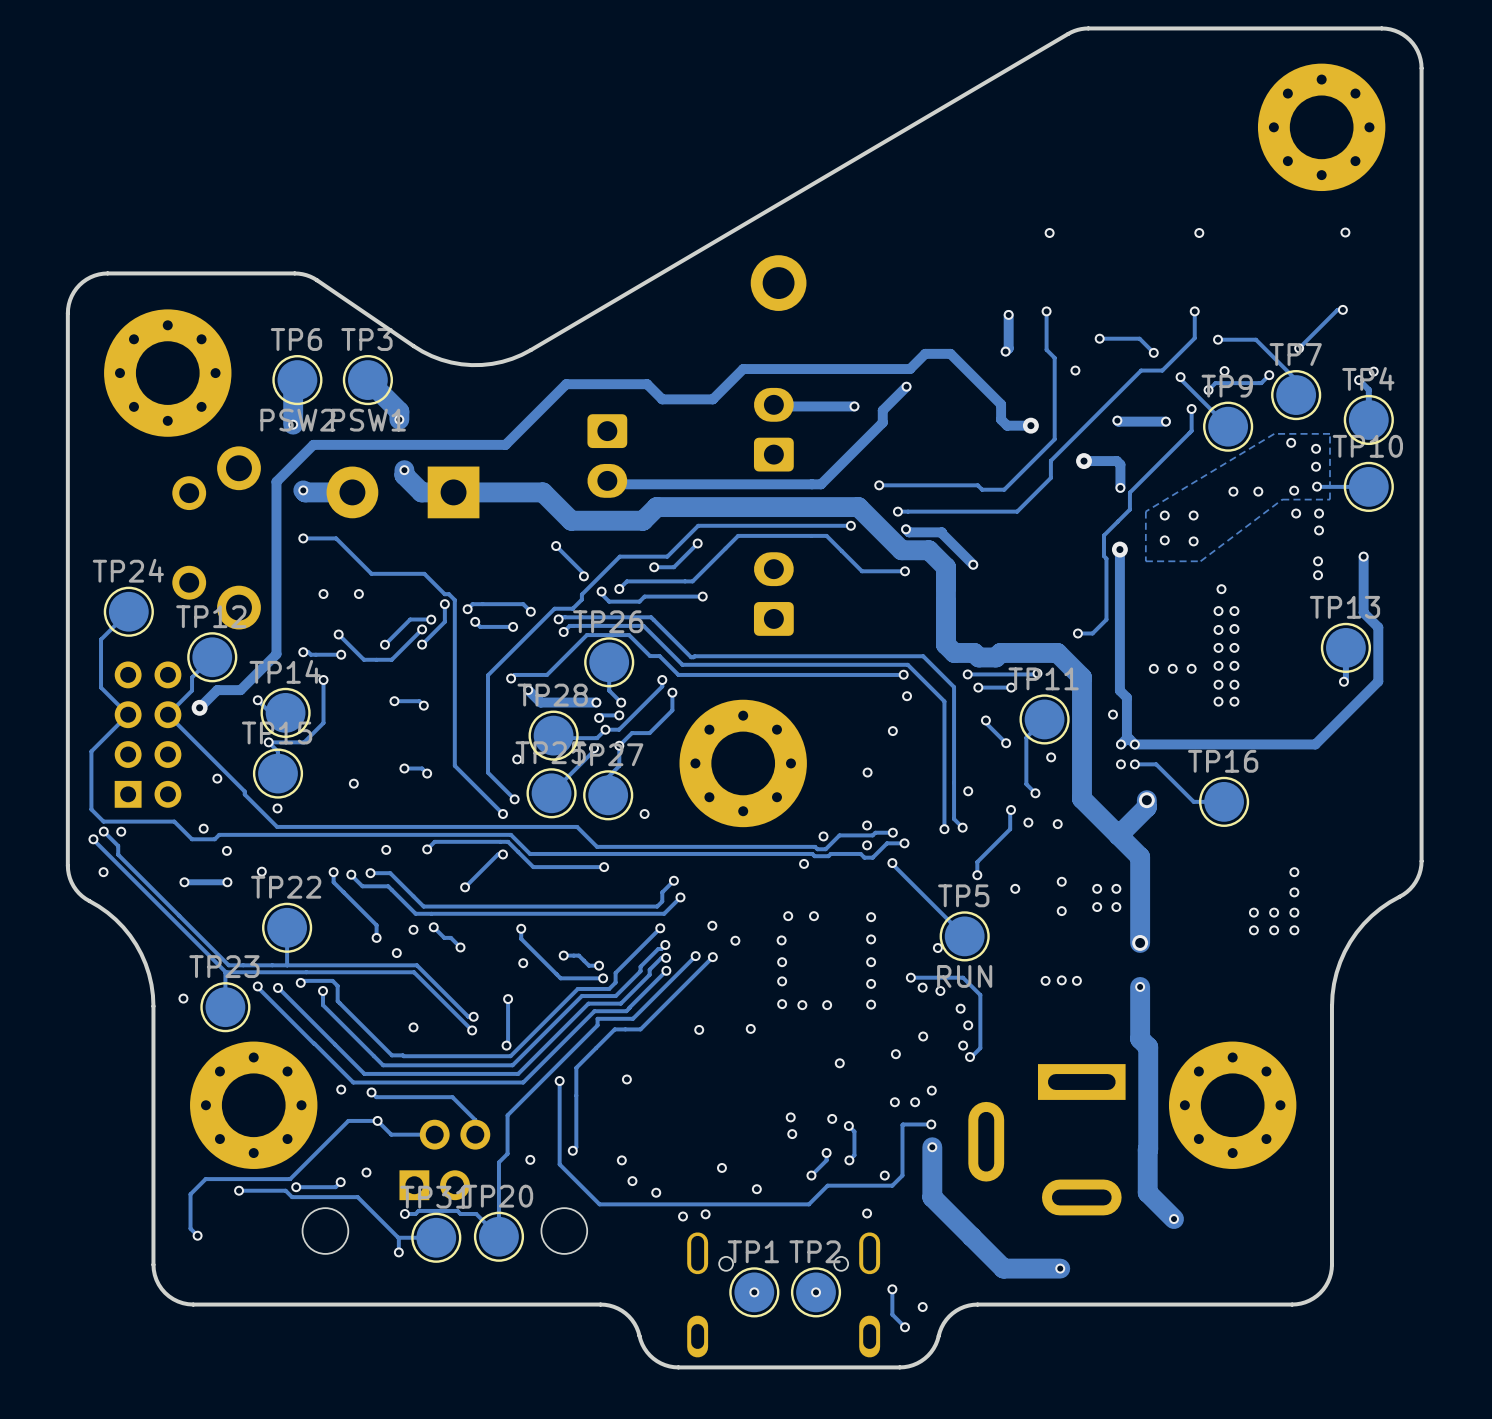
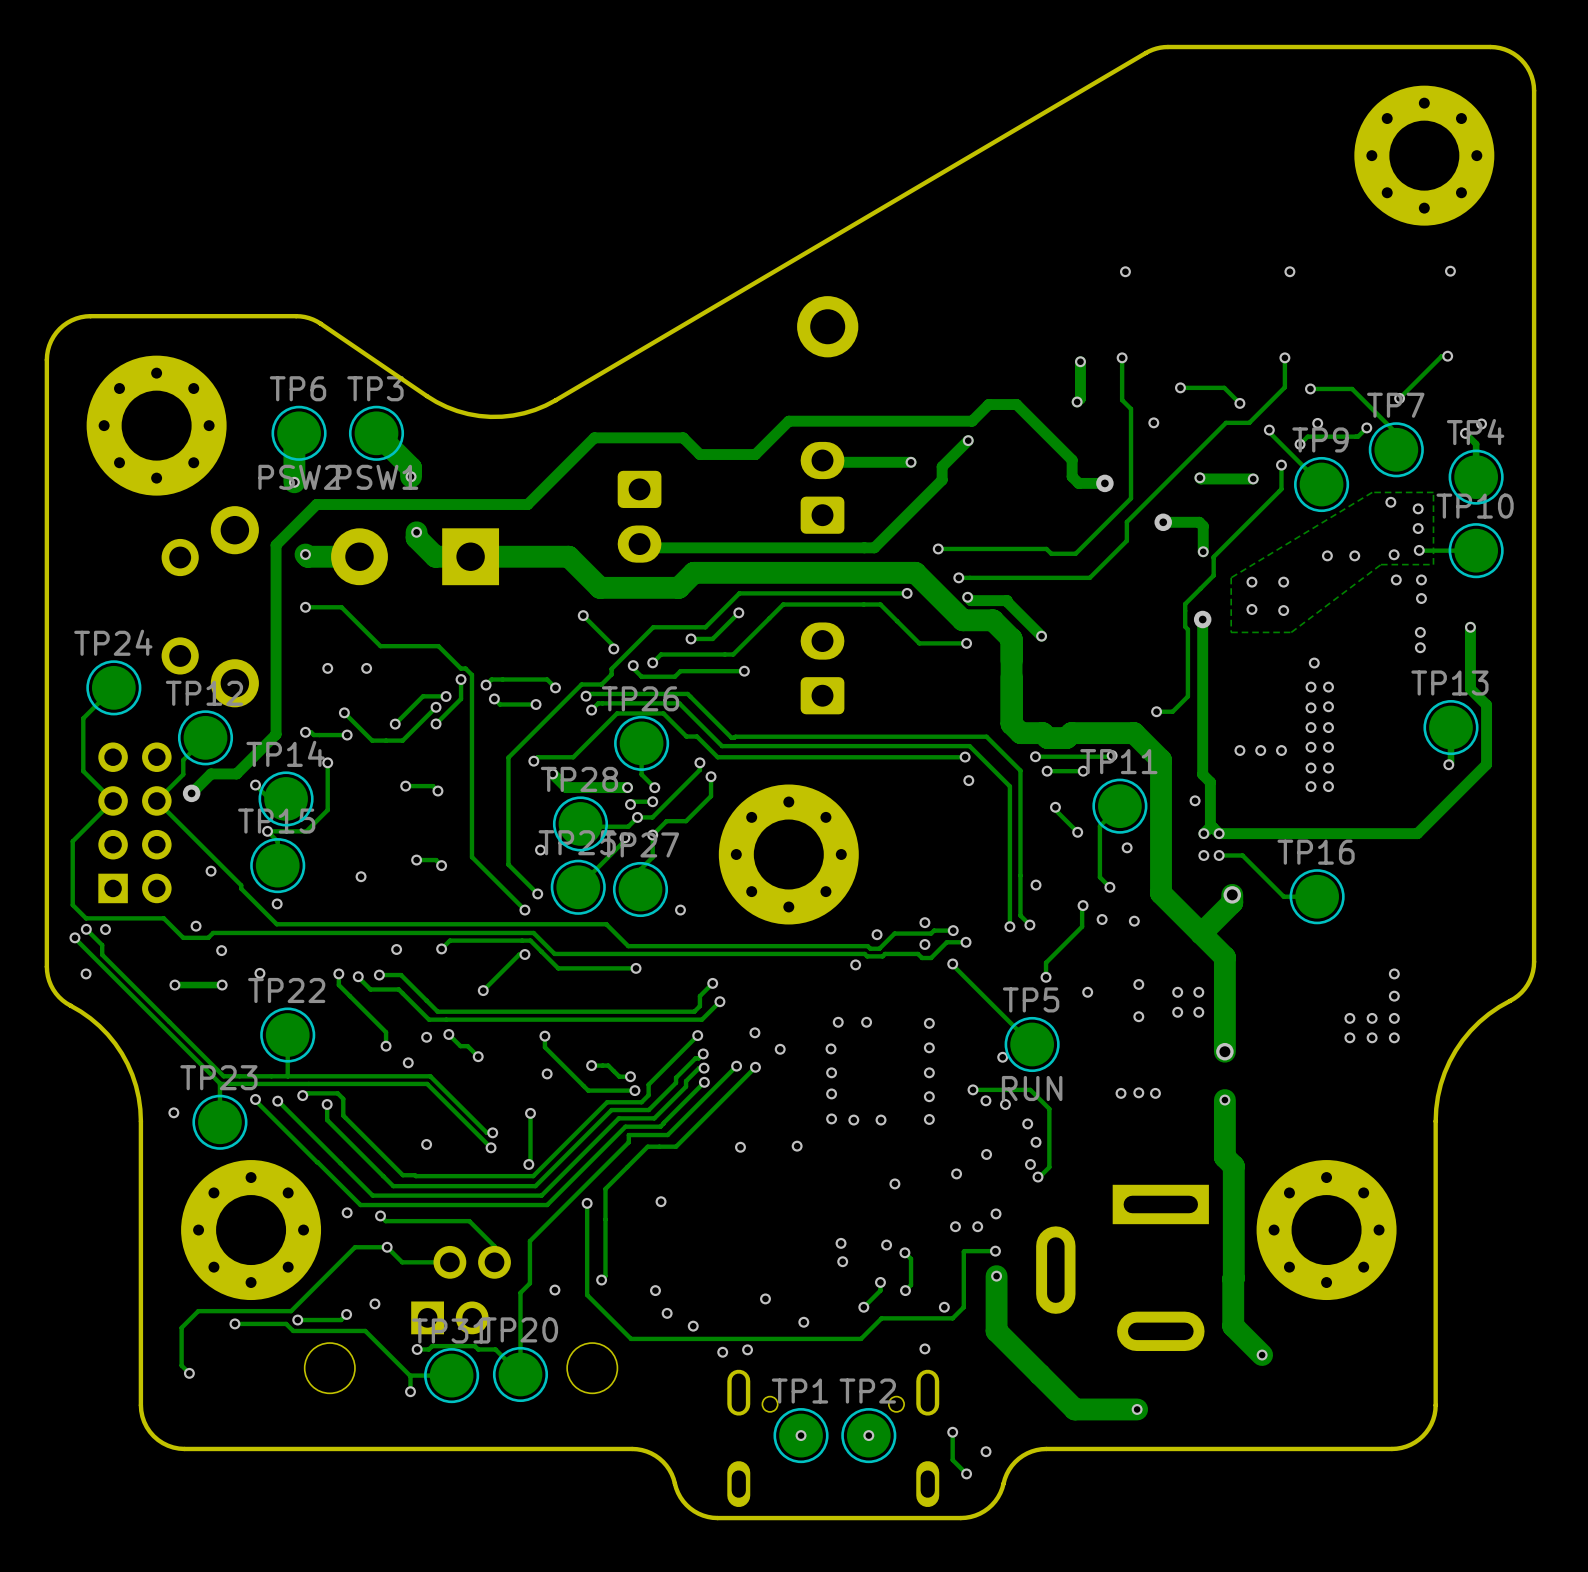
via: (892, 731) -> none
via: (867, 772) -> none

